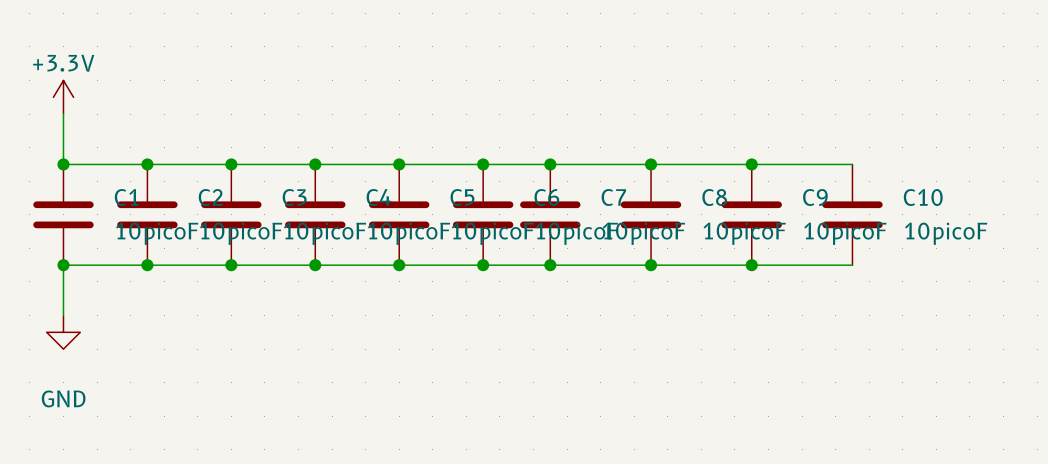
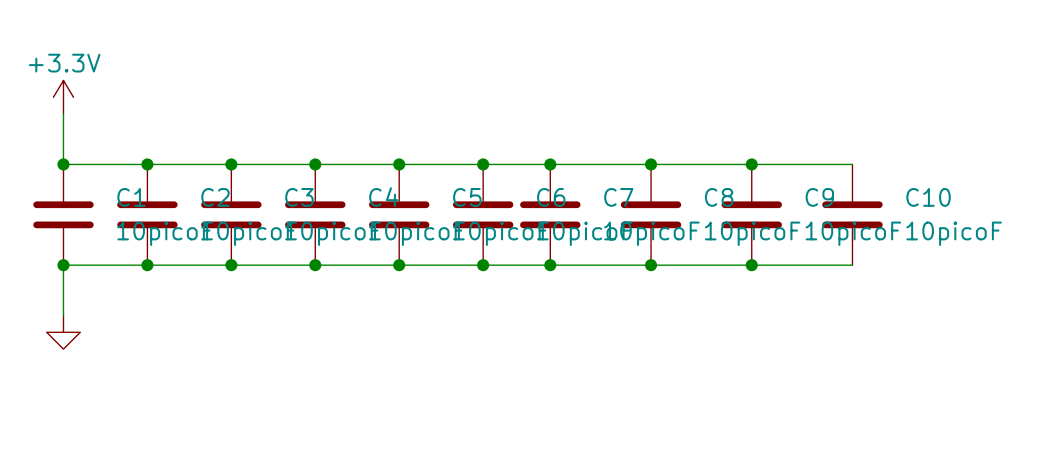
power symbol text: GND (63, 398) -> none

